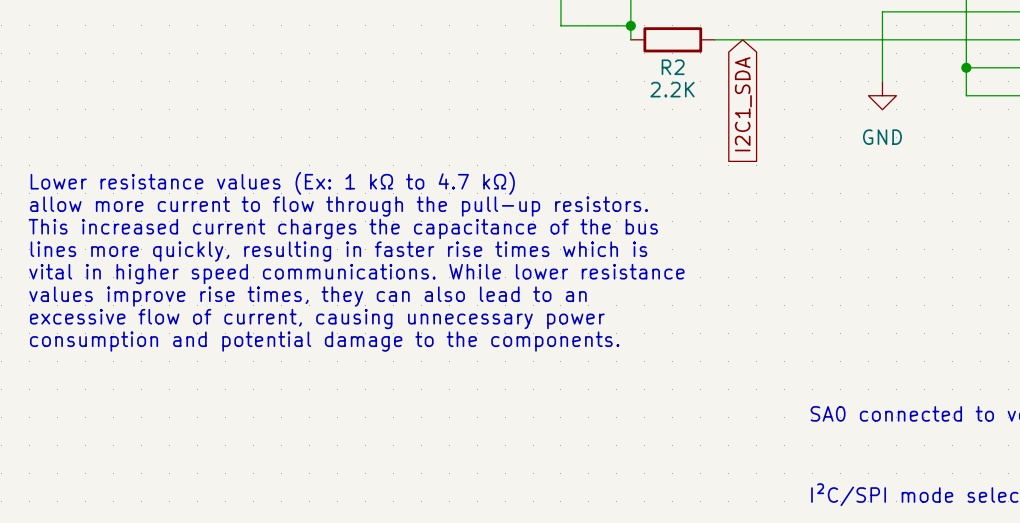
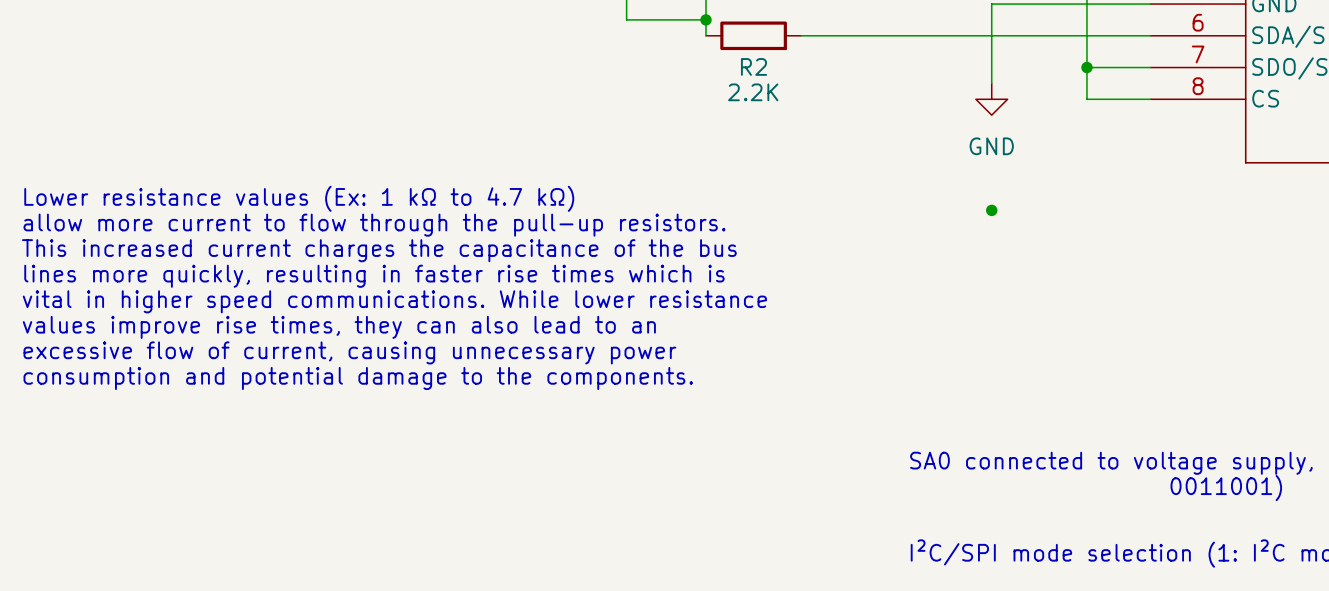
global label: I2C1_SDA (743, 104) -> none
junction: none -> (991, 210)

